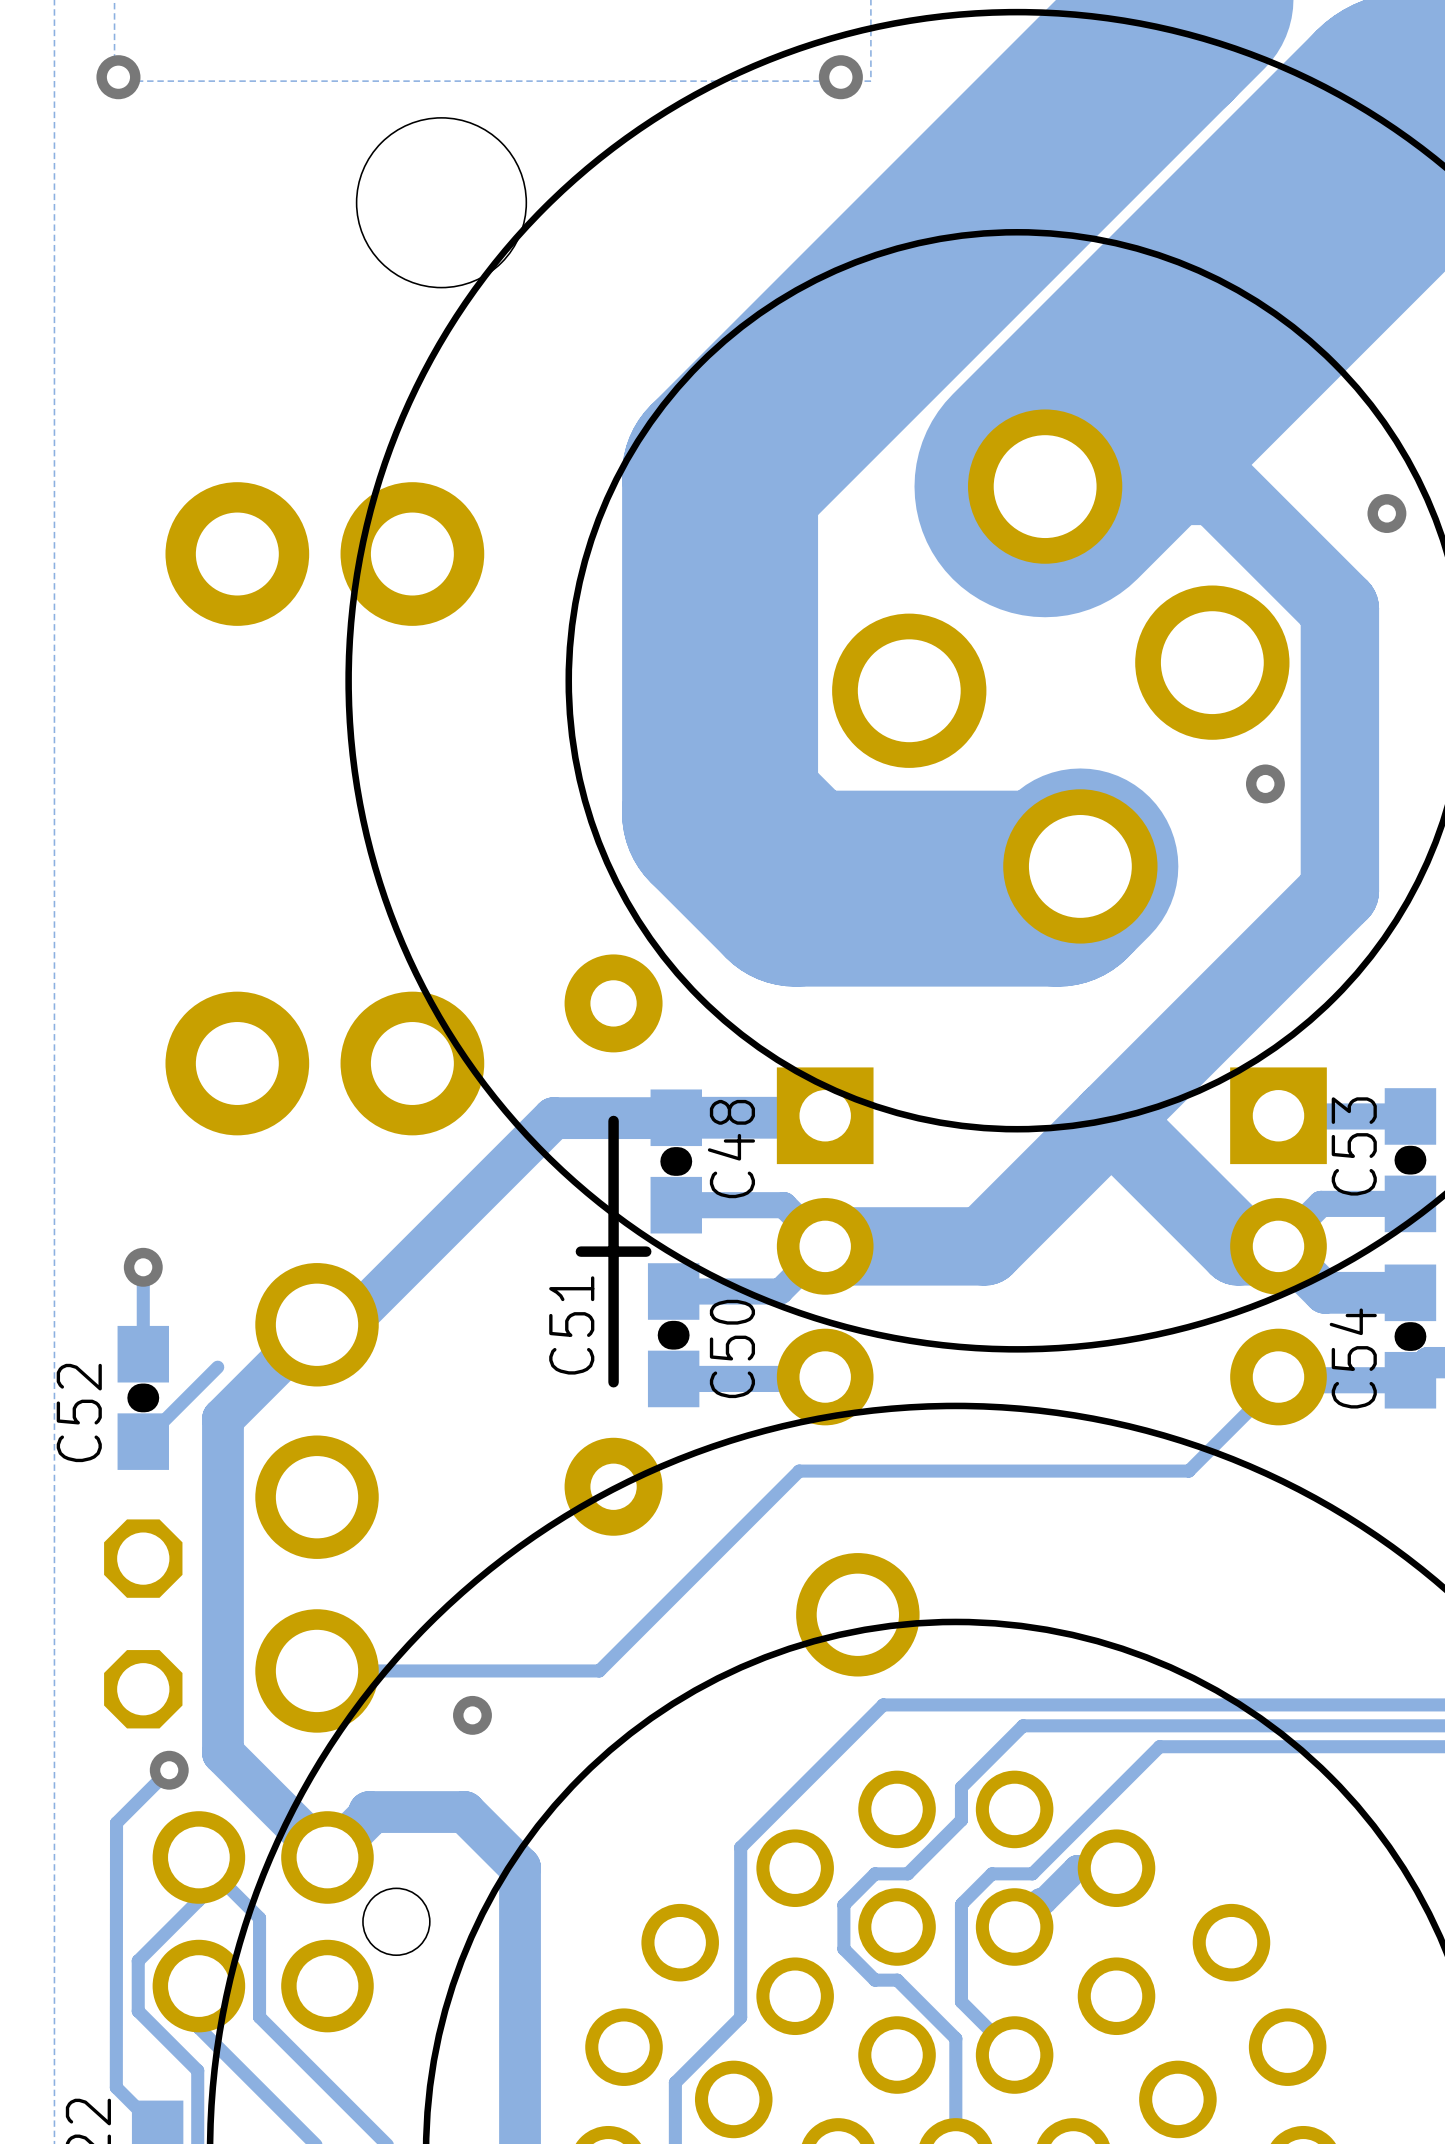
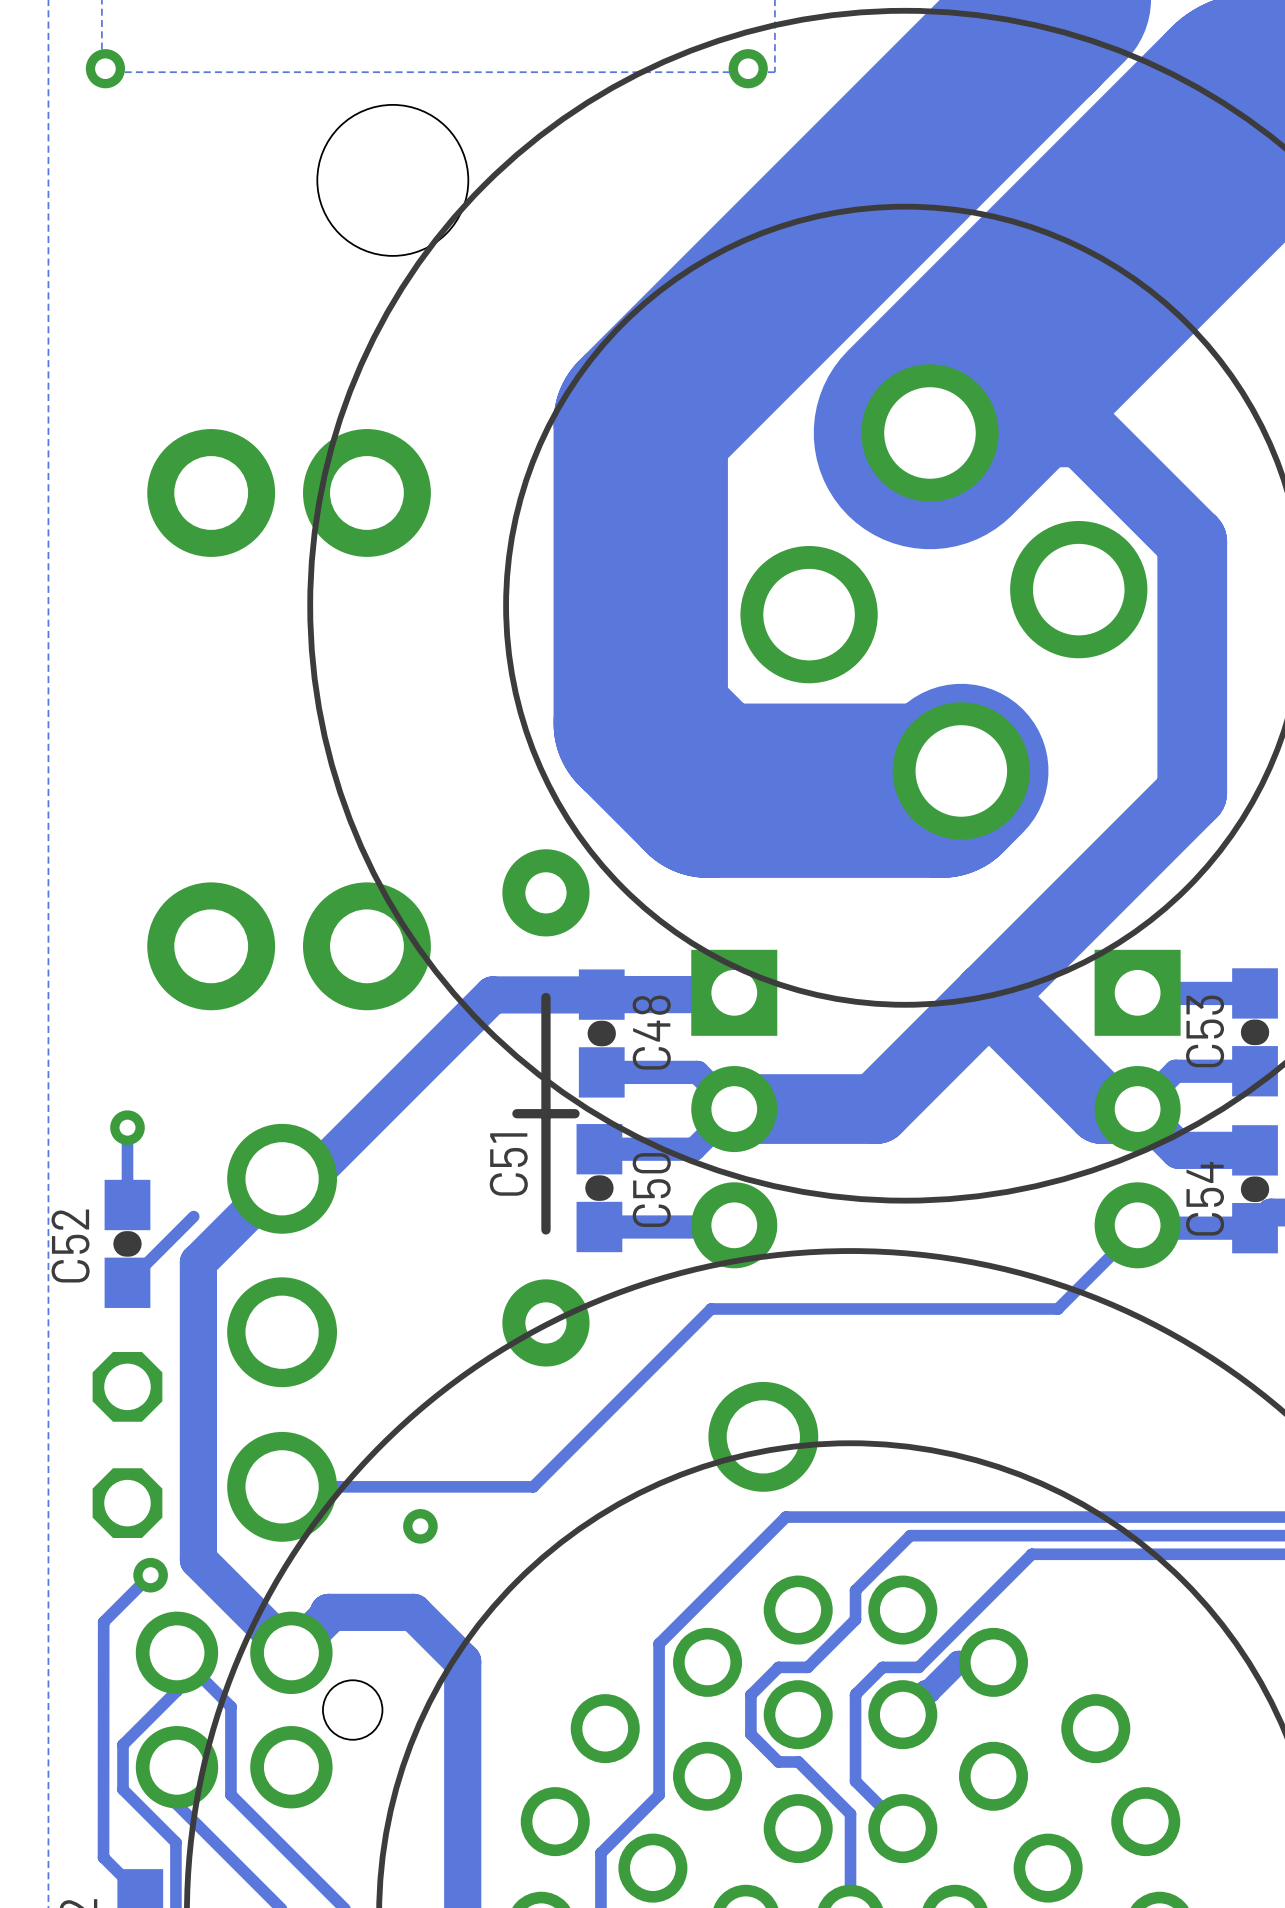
via: (1386, 513) -> none
via: (1265, 783) -> none

